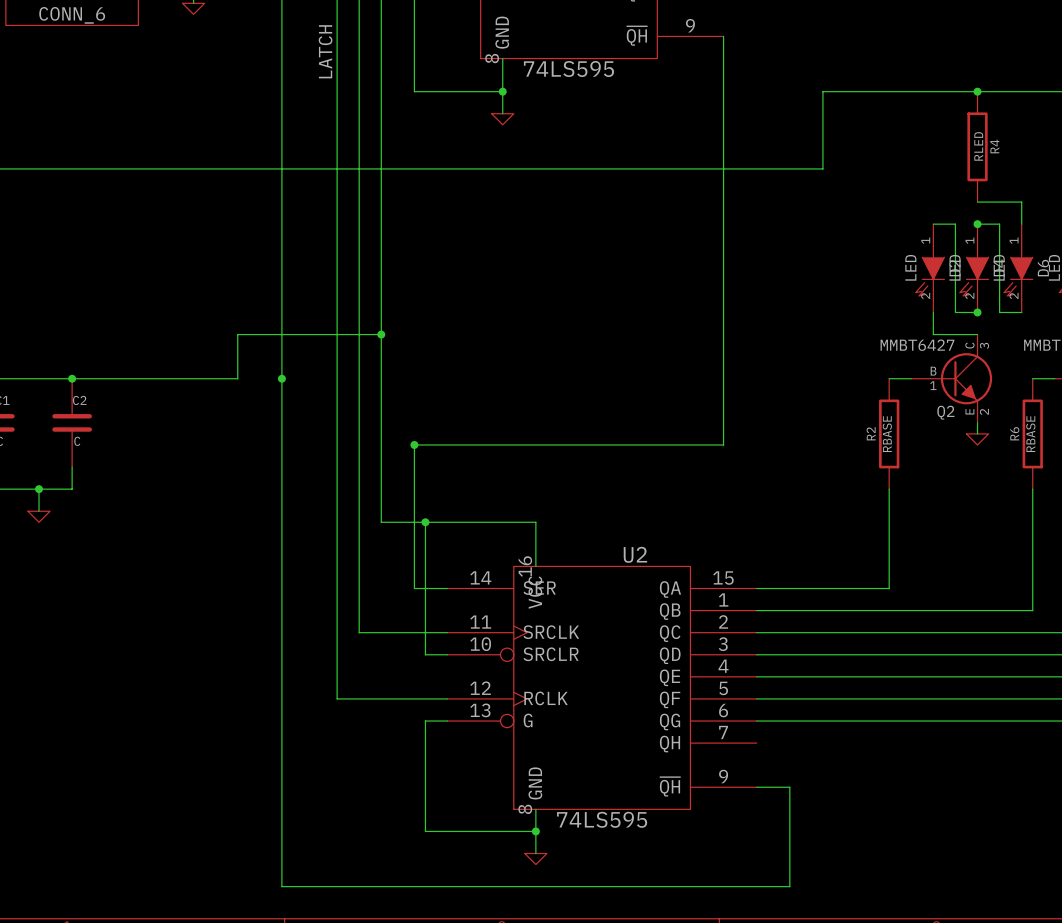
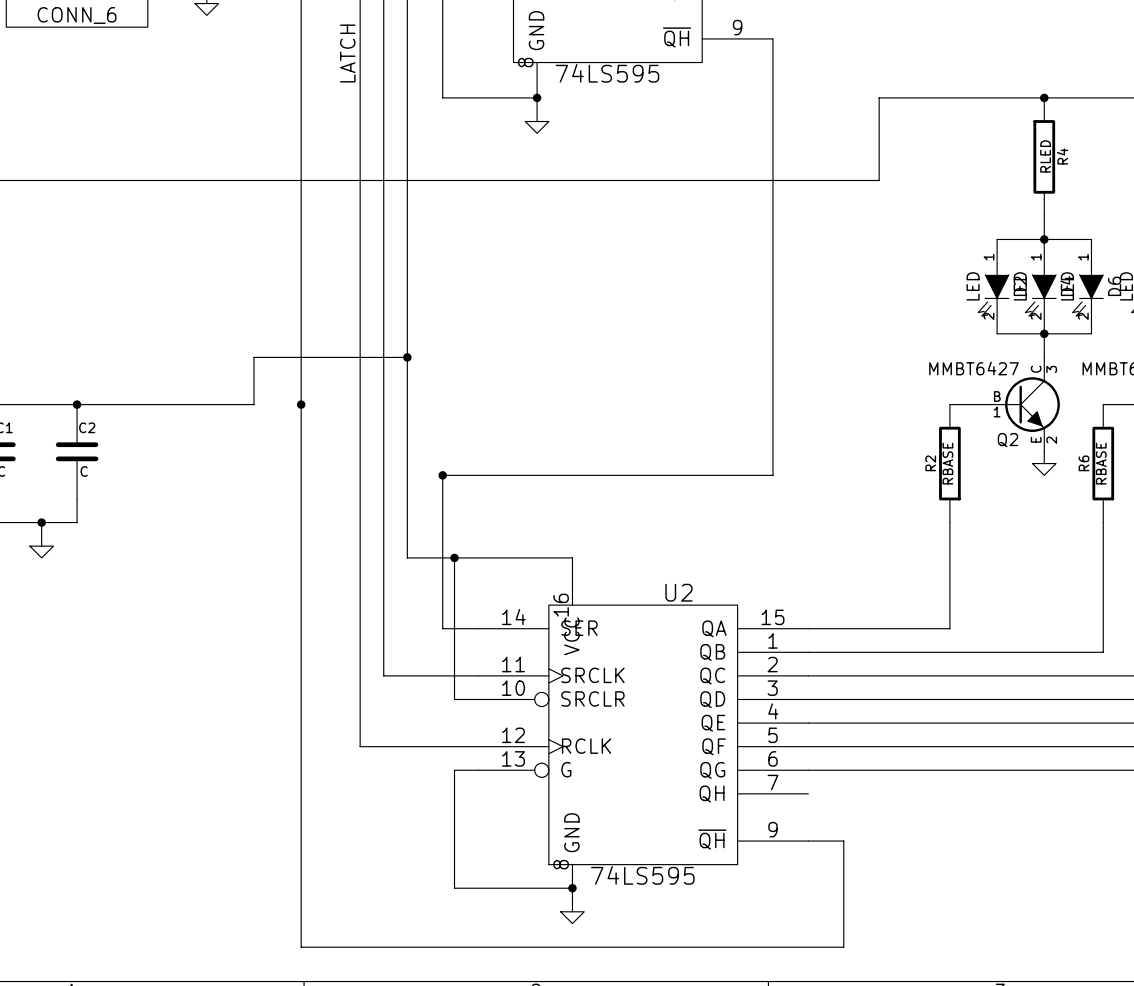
wire: (977, 202) (1021, 202) (1021, 224) -> (1067, 239) (1091, 239)
wire: (955, 224) (955, 312) -> (1020, 239) (1044, 239) (1044, 215)
wire: (999, 224) (999, 312) -> (1044, 357) (1044, 333) (1067, 333)
wire: (933, 312) (933, 334) (977, 334) -> (997, 333) (1020, 333)

